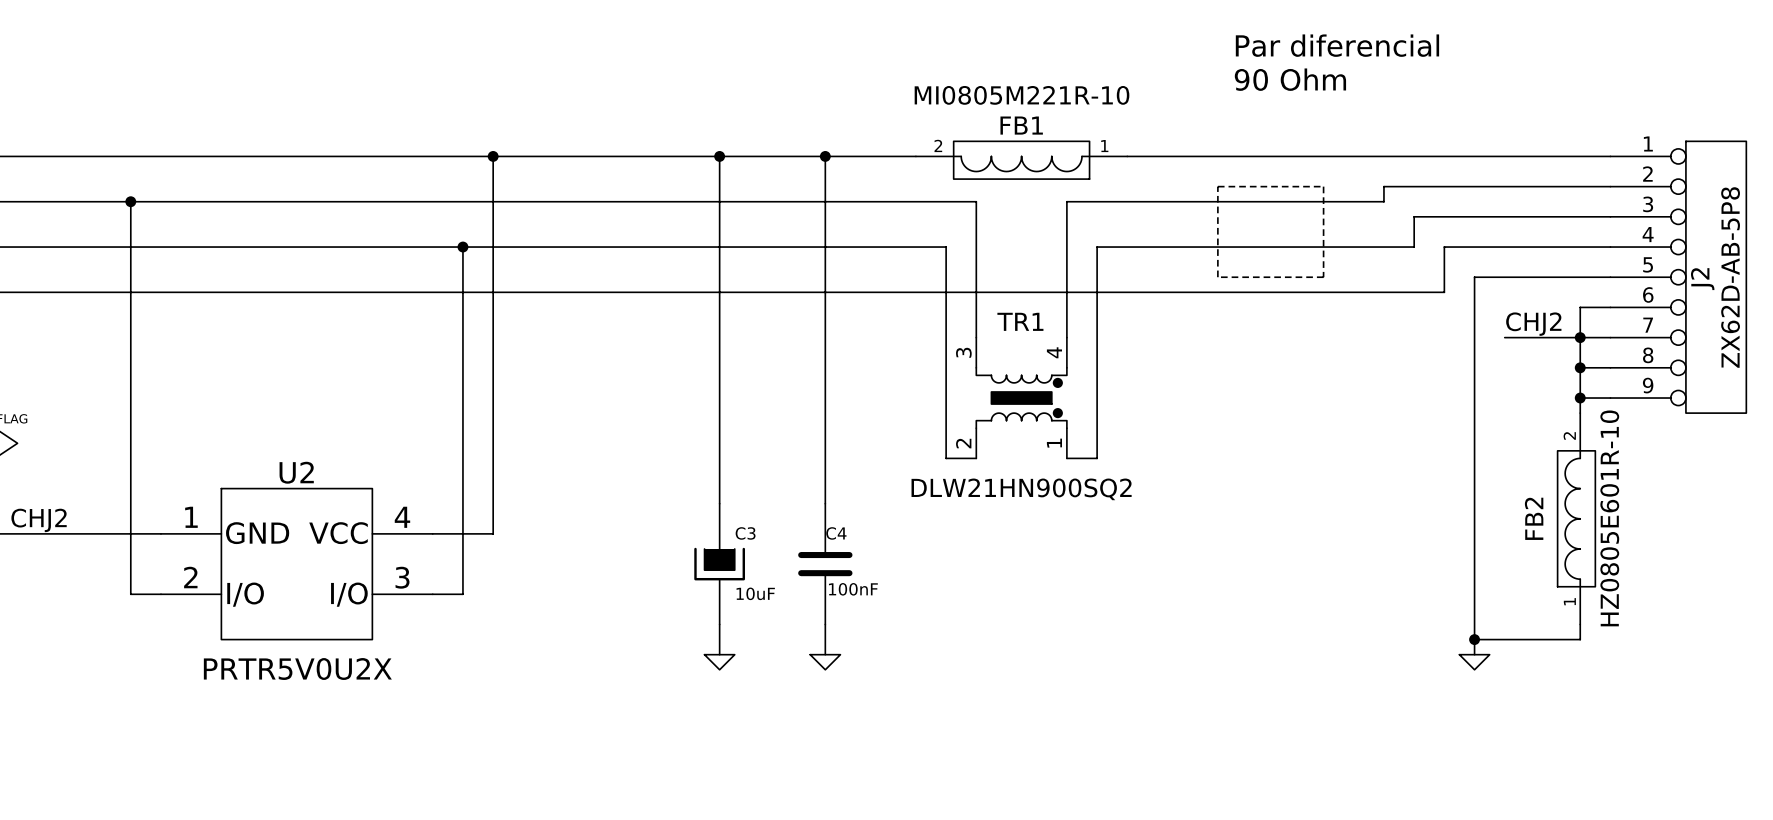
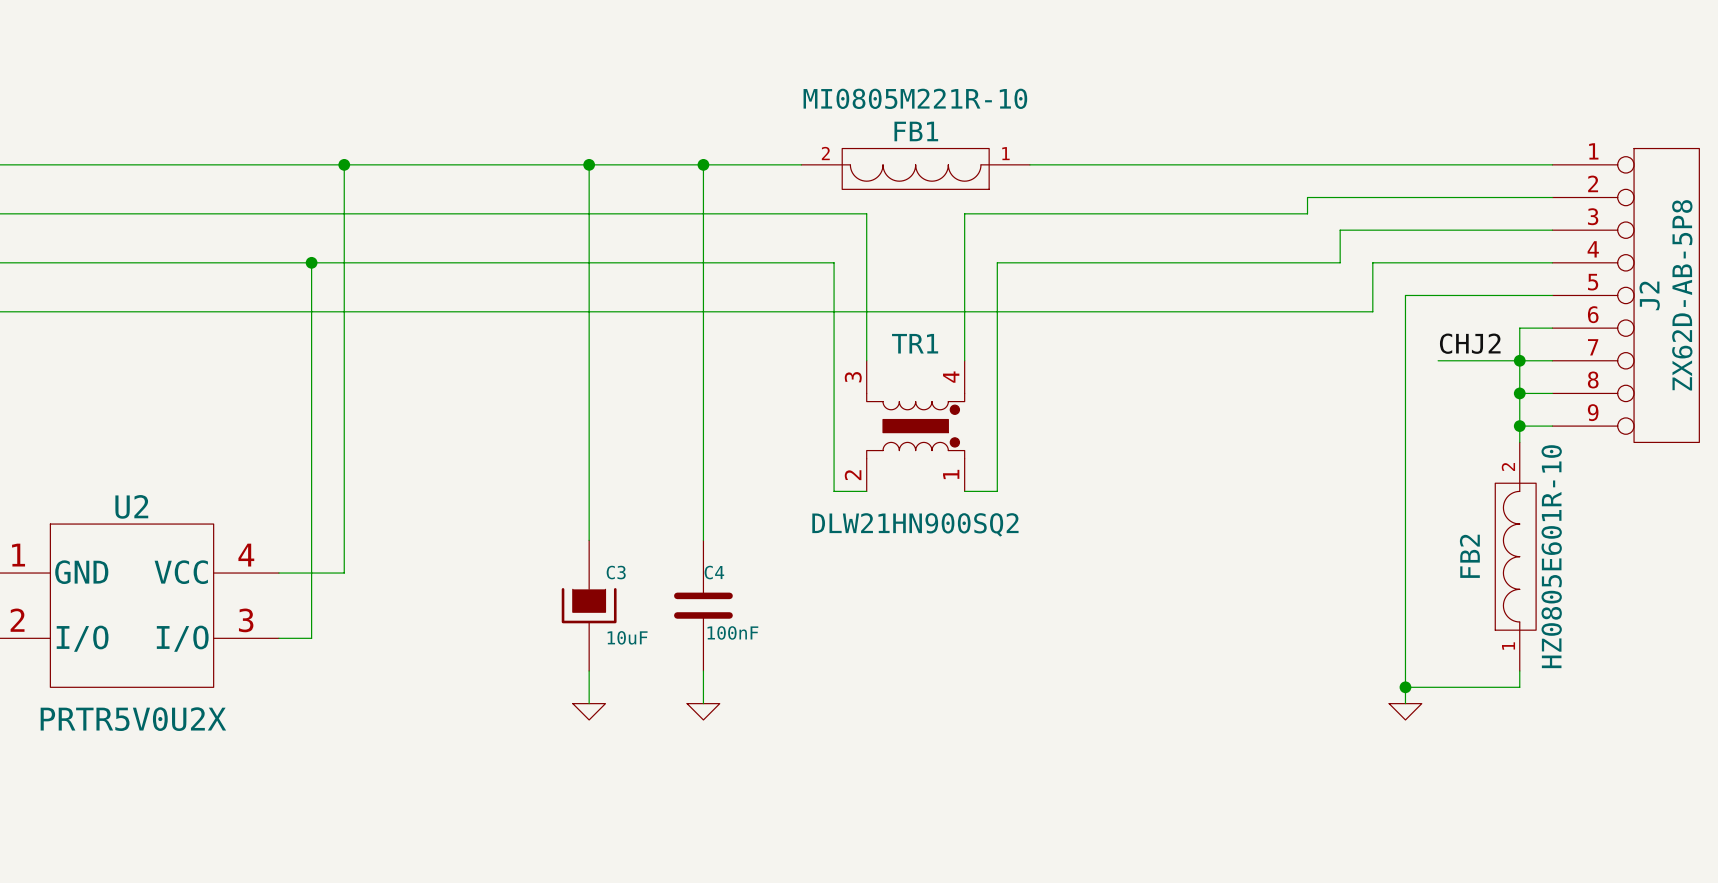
text: Par diferencial (1337, 45) -> none
text: 90 Ohm (1290, 79) -> none
line: (1217, 186) (1323, 186) (1323, 277) (1217, 277) (1217, 186) -> none

